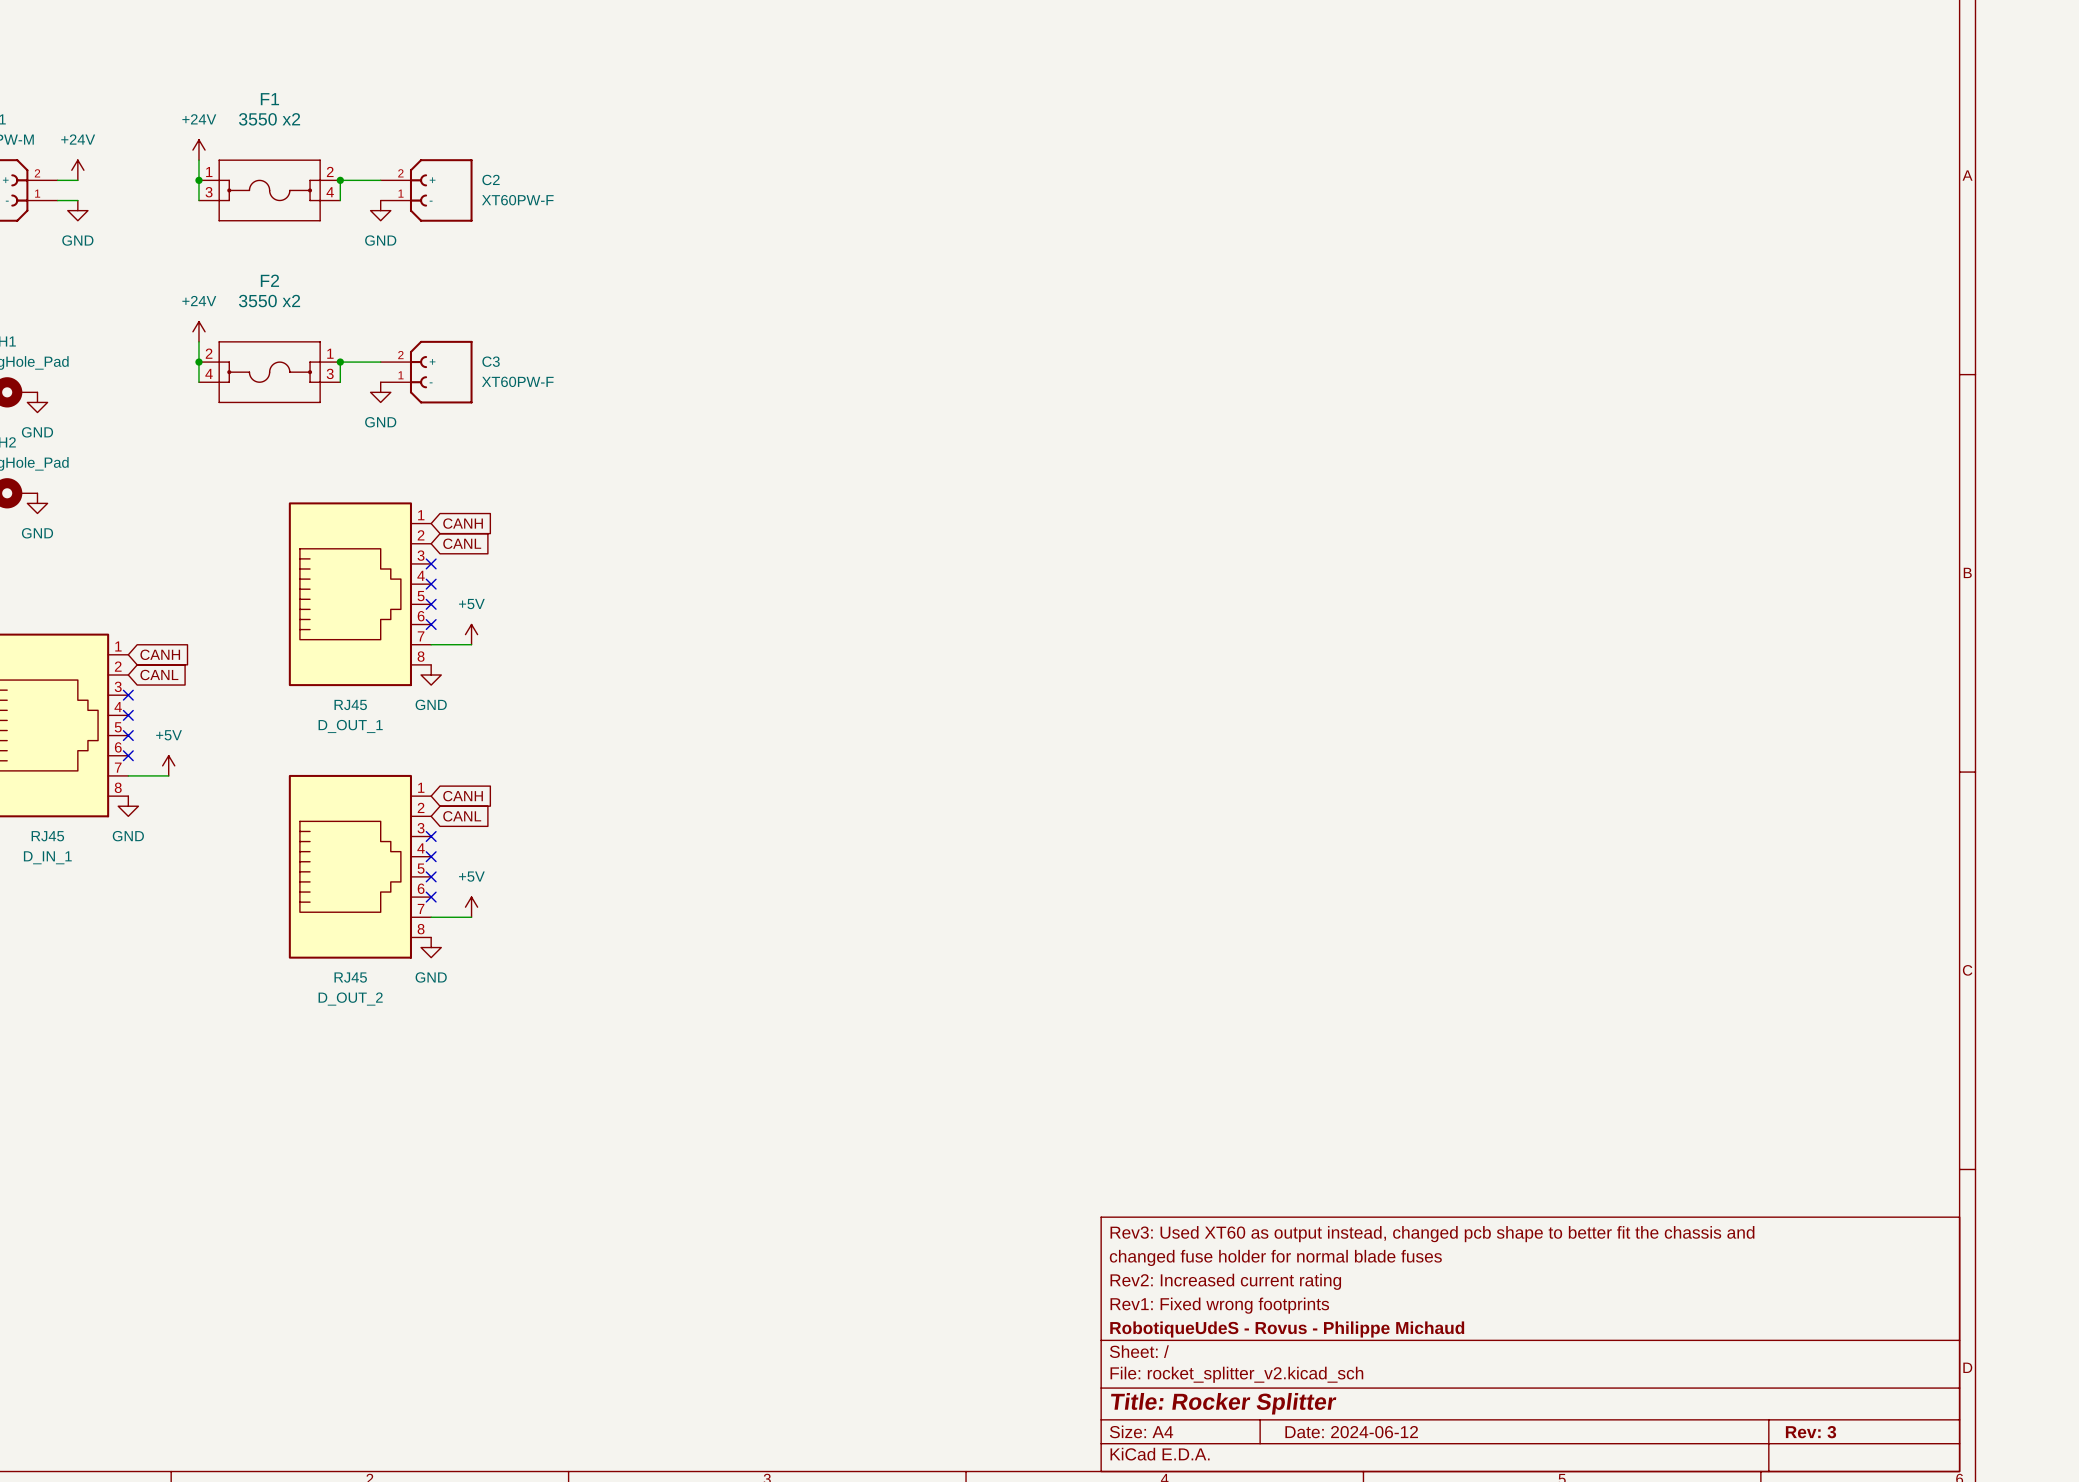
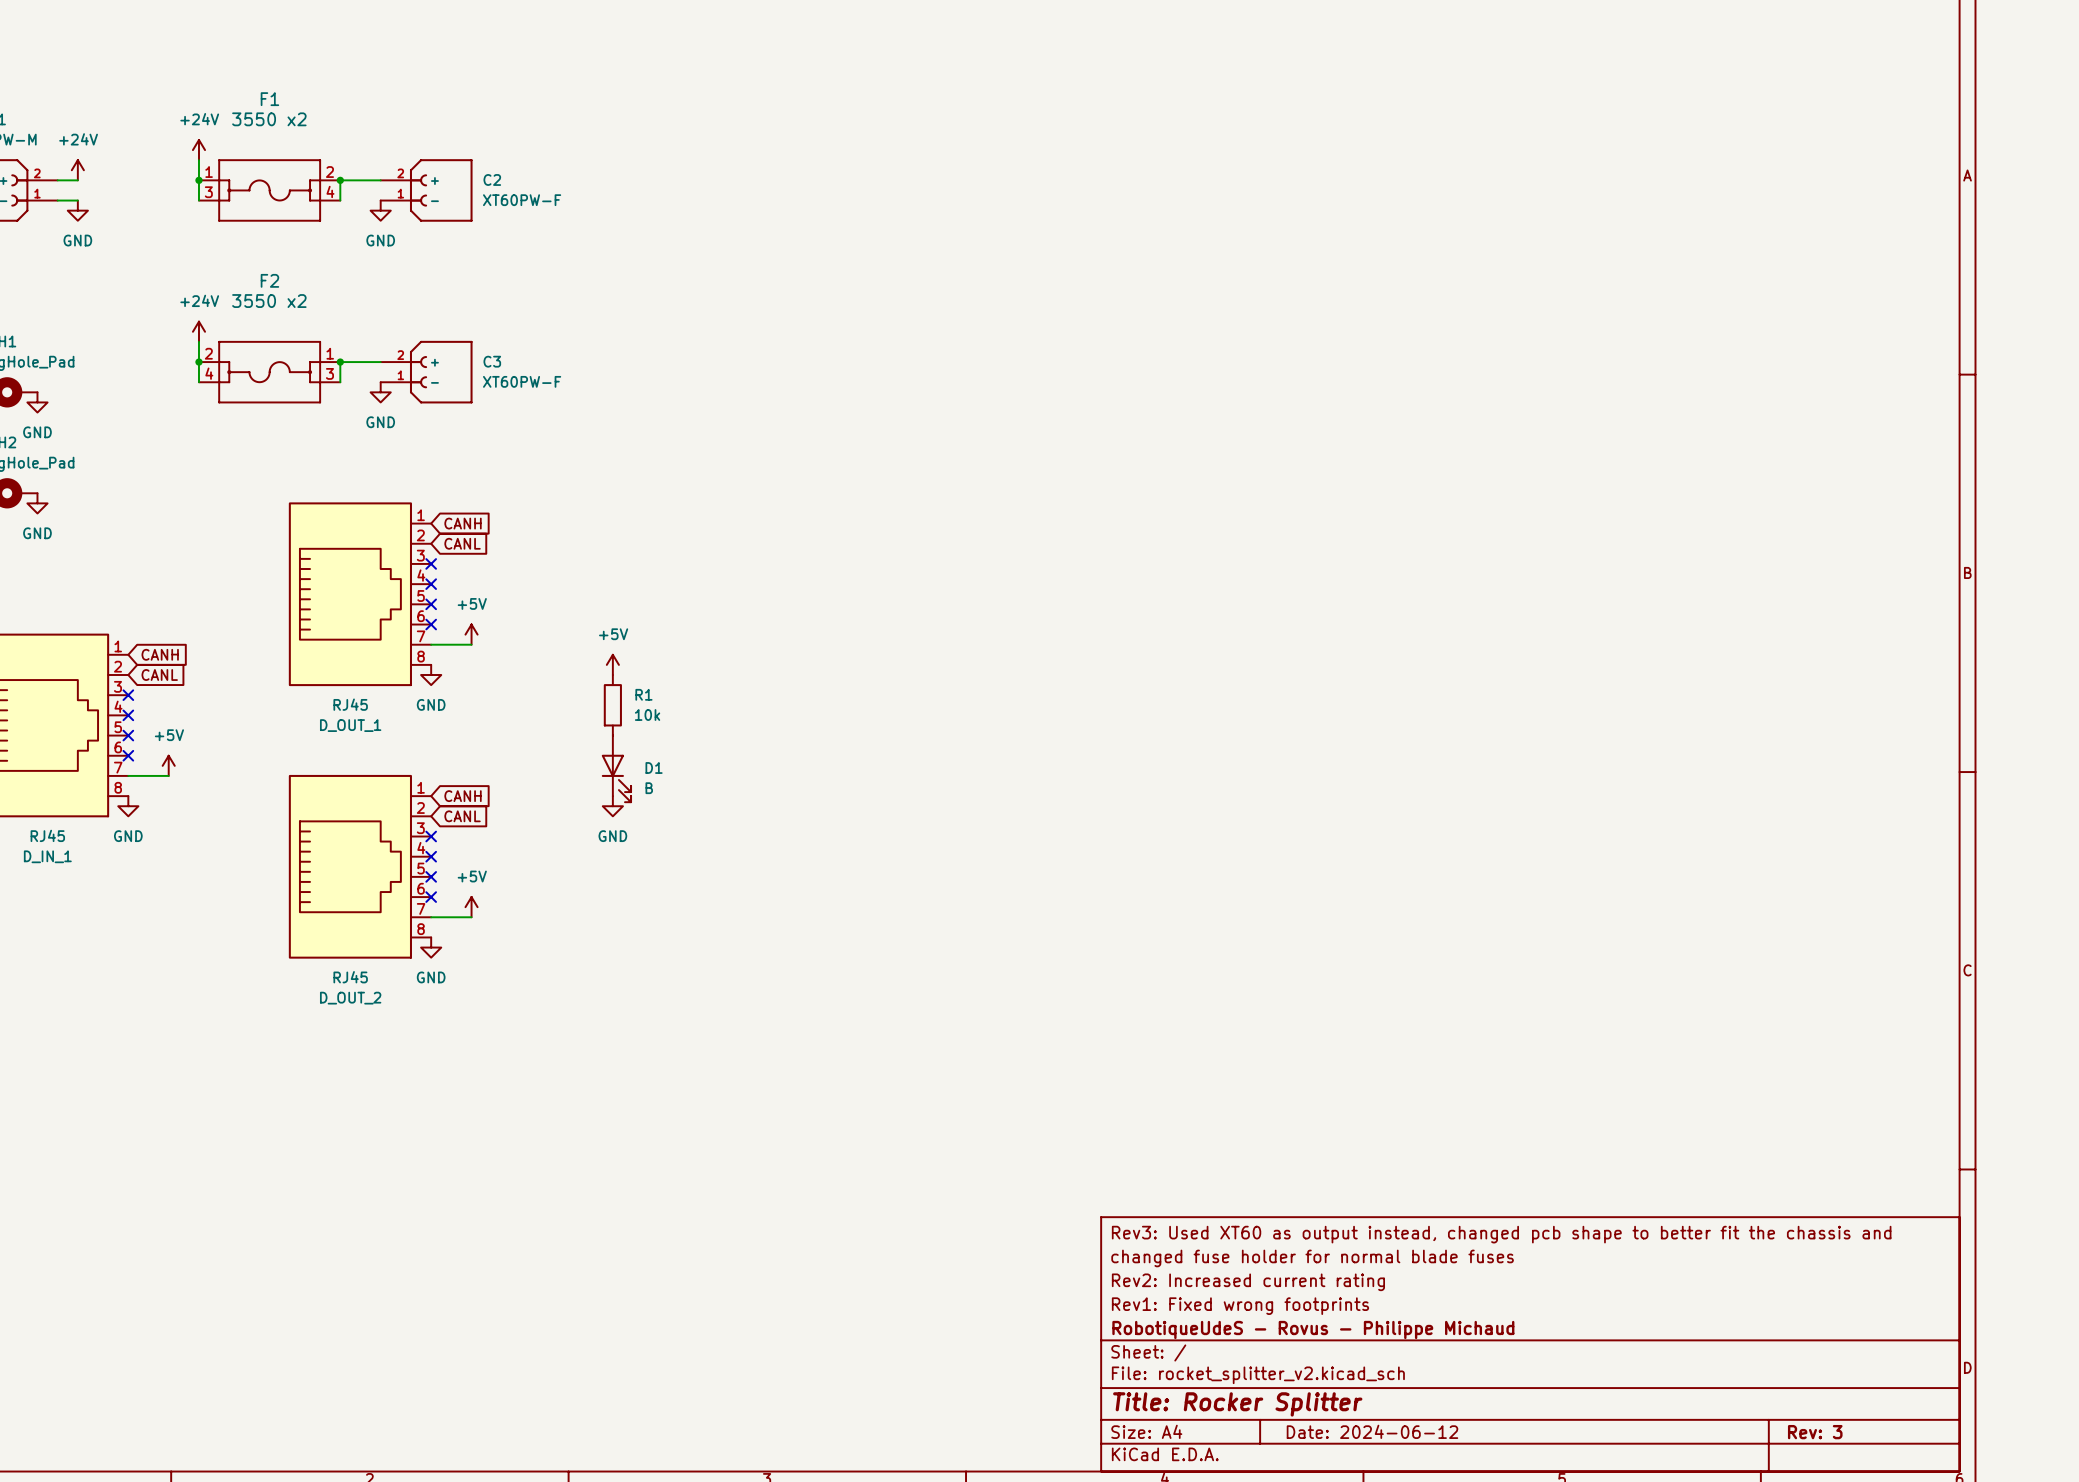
power symbol: none -> +5V (612, 664)
R1: none -> 10k (612, 705)
D1: none -> B (616, 768)
power symbol: none -> GND (612, 806)

